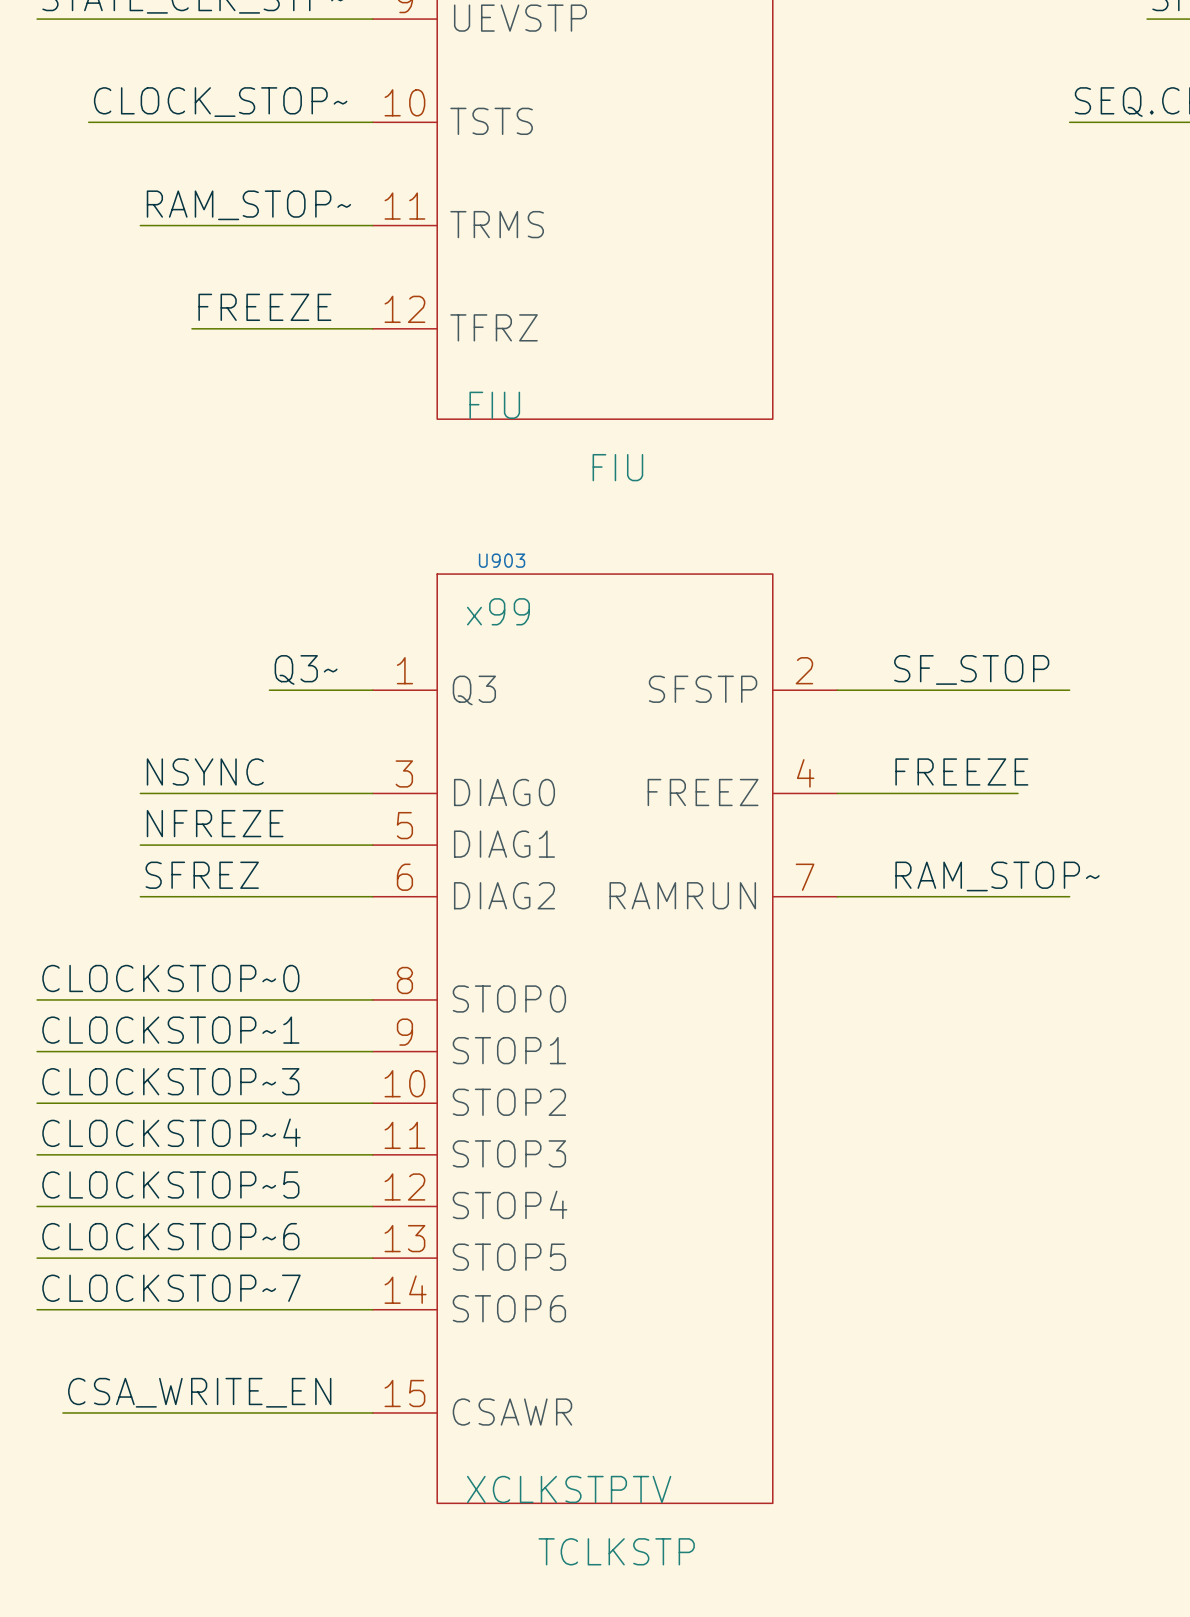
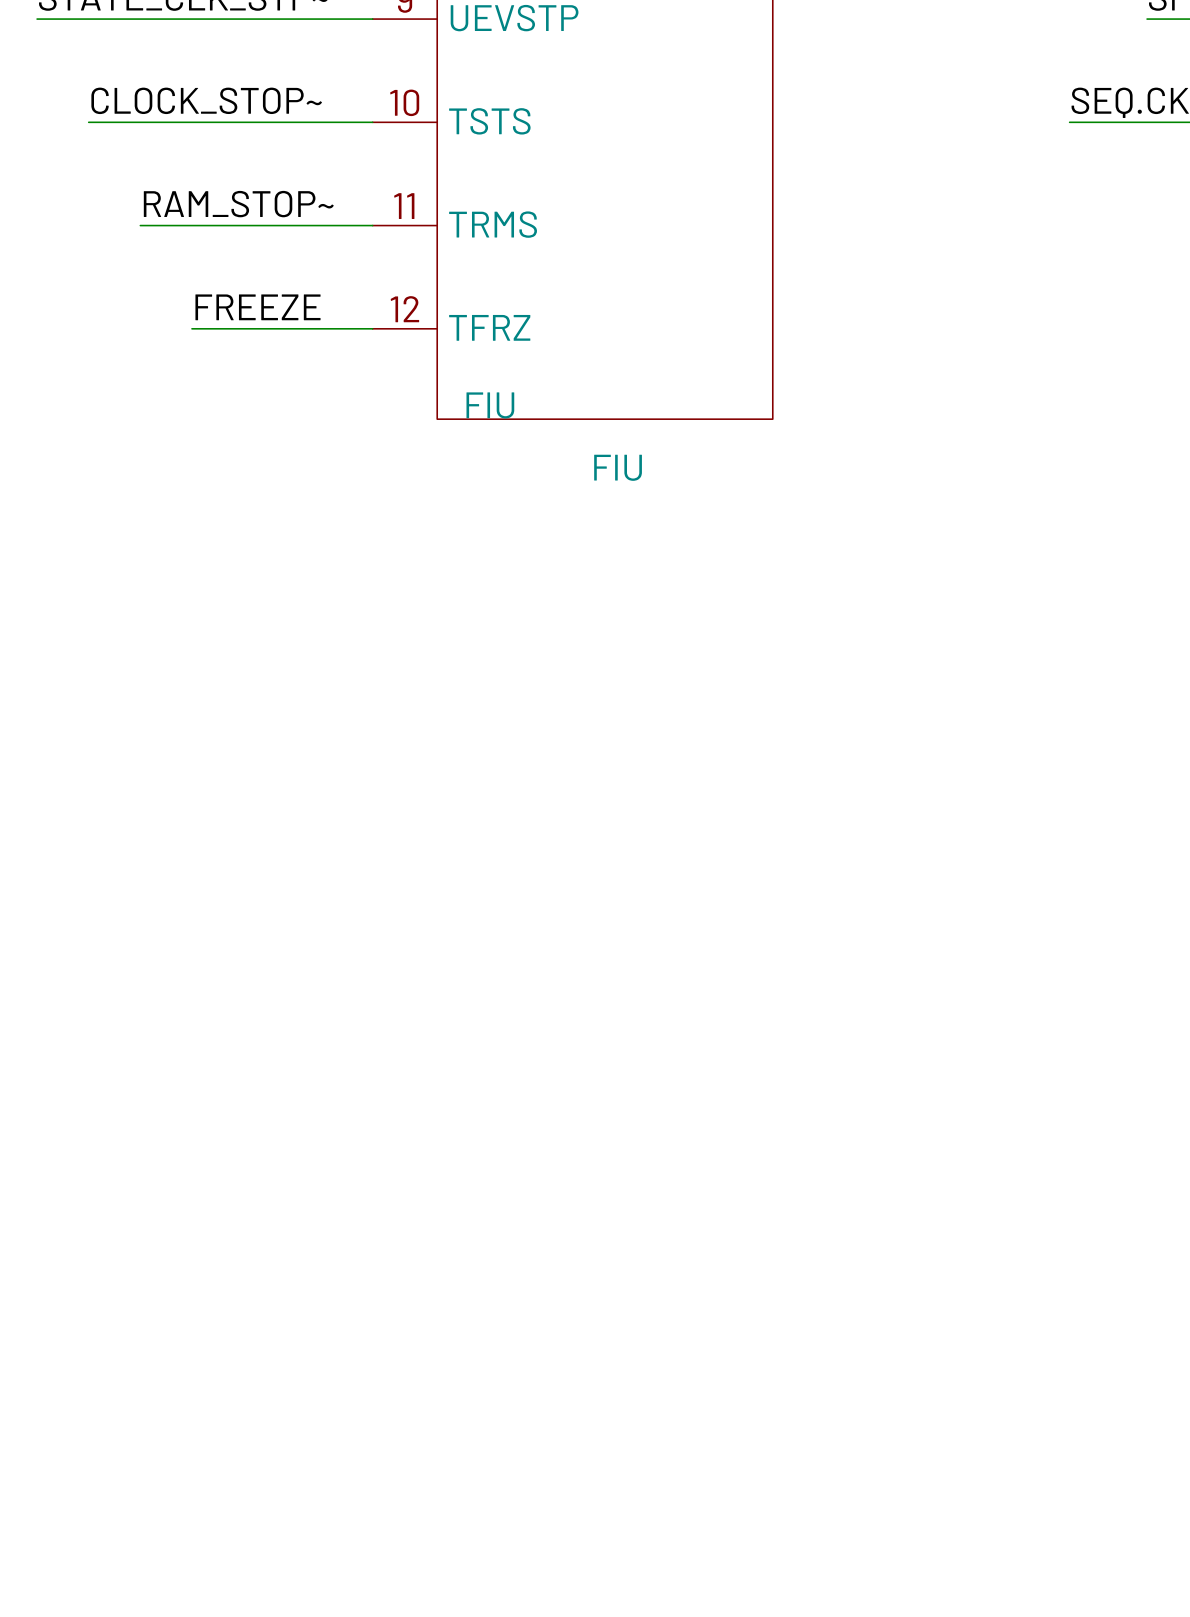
label: Q3~ (306, 669) -> none
label: SF_STOP (971, 669) -> none
wire: (269, 690) (372, 690) -> none
wire: (837, 690) (1069, 690) -> none
label: NSYNC (205, 771) -> none
label: FREEZE (961, 771) -> none
wire: (140, 793) (372, 793) -> none
wire: (837, 793) (1018, 793) -> none
label: NFREZE (215, 823) -> none
wire: (140, 845) (372, 845) -> none
label: SFREZ (202, 875) -> none
label: RAM_STOP~ (997, 876) -> none
wire: (140, 896) (372, 896) -> none
wire: (837, 896) (1069, 896) -> none
label: CLOCKSTOP~0 (170, 978) -> none
wire: (37, 999) (372, 999) -> none
label: CLOCKSTOP~1 (170, 1030) -> none
U903: XCLKSTPTV (604, 1038) -> none
wire: (37, 1051) (372, 1051) -> none
label: CLOCKSTOP~3 (170, 1081) -> none
wire: (37, 1103) (372, 1103) -> none
label: CLOCKSTOP~4 (171, 1132) -> none
wire: (37, 1154) (372, 1154) -> none
label: CLOCKSTOP~5 (170, 1184) -> none
wire: (37, 1206) (372, 1206) -> none
label: CLOCKSTOP~6 (170, 1236) -> none
wire: (37, 1258) (372, 1258) -> none
label: CLOCKSTOP~7 (171, 1288) -> none
wire: (37, 1309) (372, 1309) -> none
label: CSA_WRITE_EN (199, 1392) -> none
wire: (62, 1412) (372, 1412) -> none

